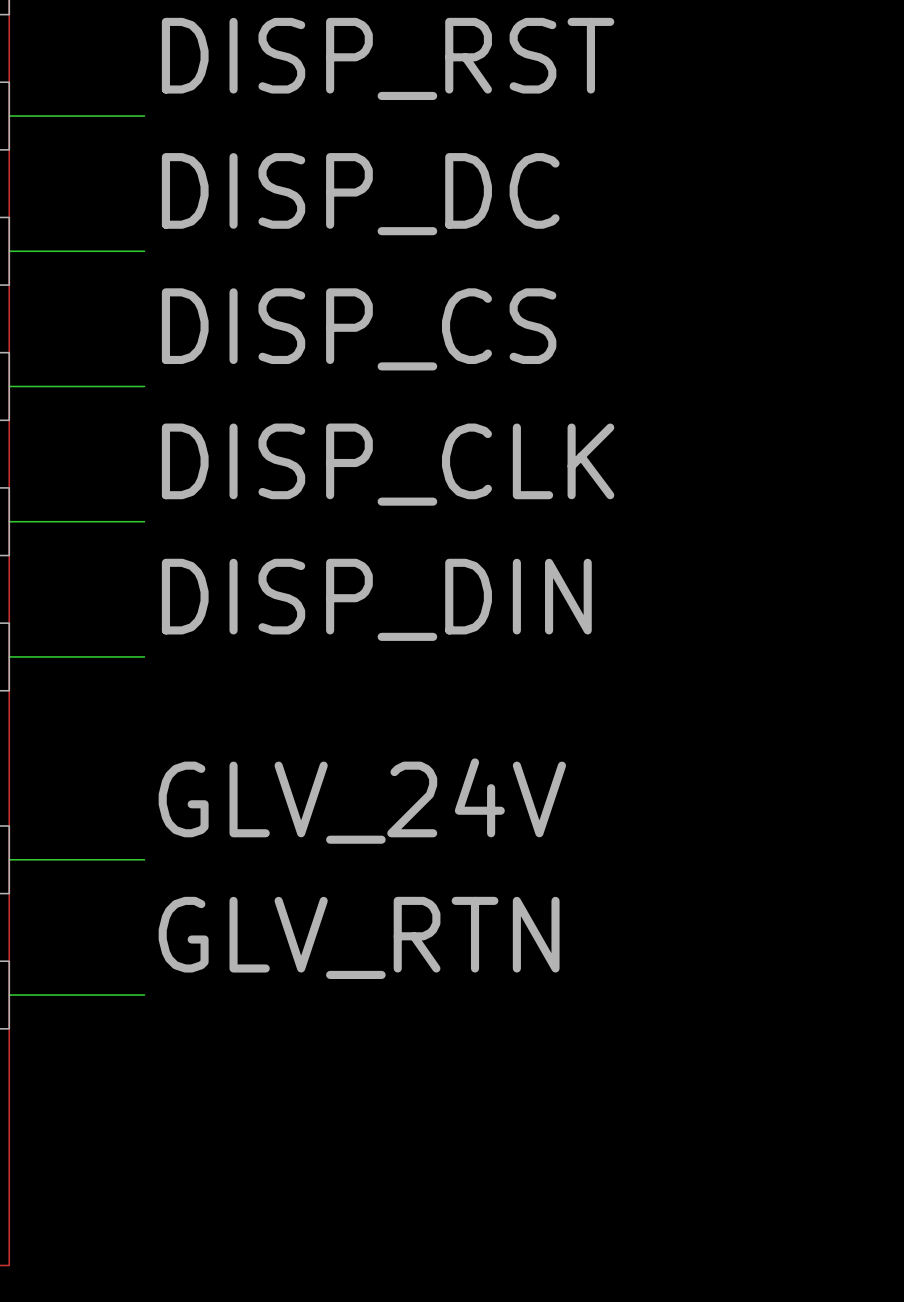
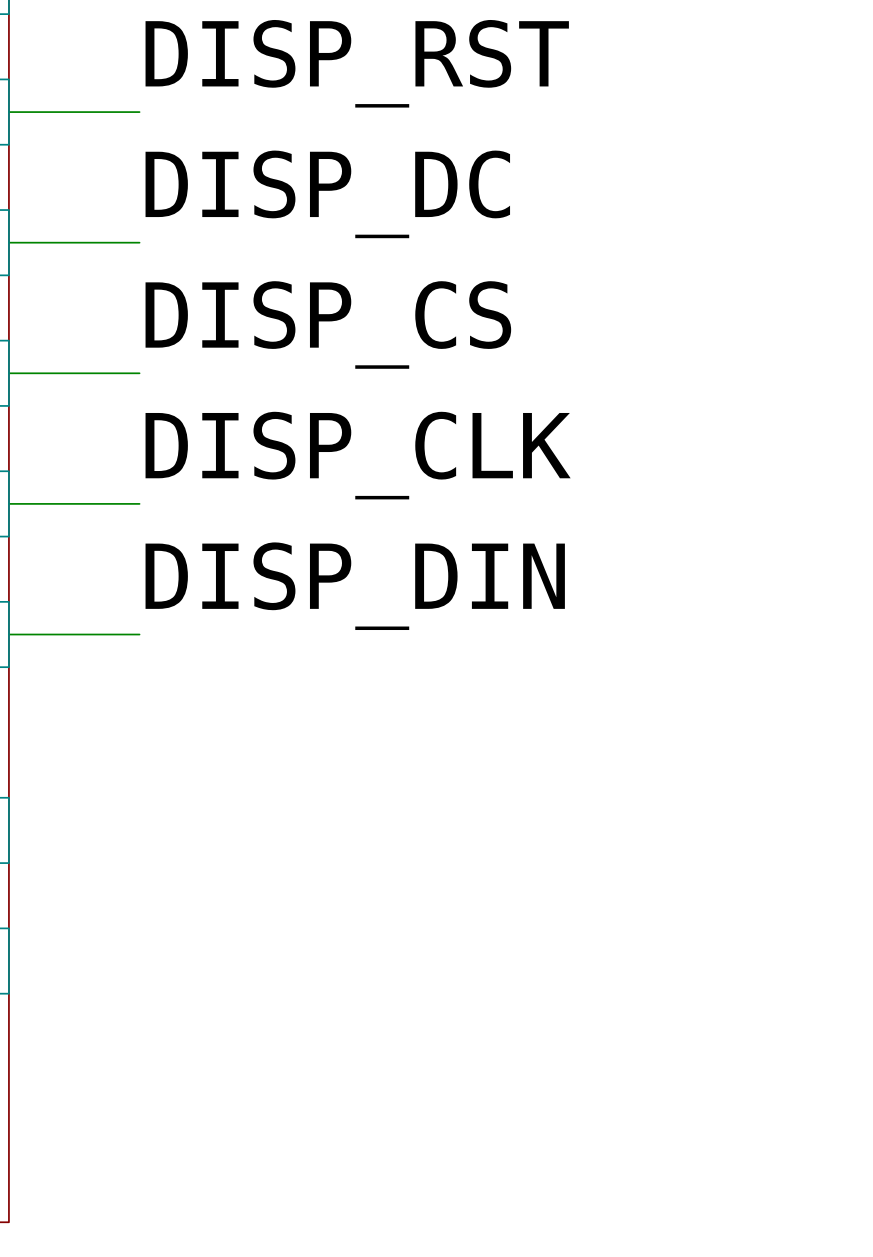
label: GLV_24V (362, 801) -> none
wire: (9, 859) (144, 859) -> none
label: GLV_RTN (359, 937) -> none
wire: (9, 995) (144, 995) -> none

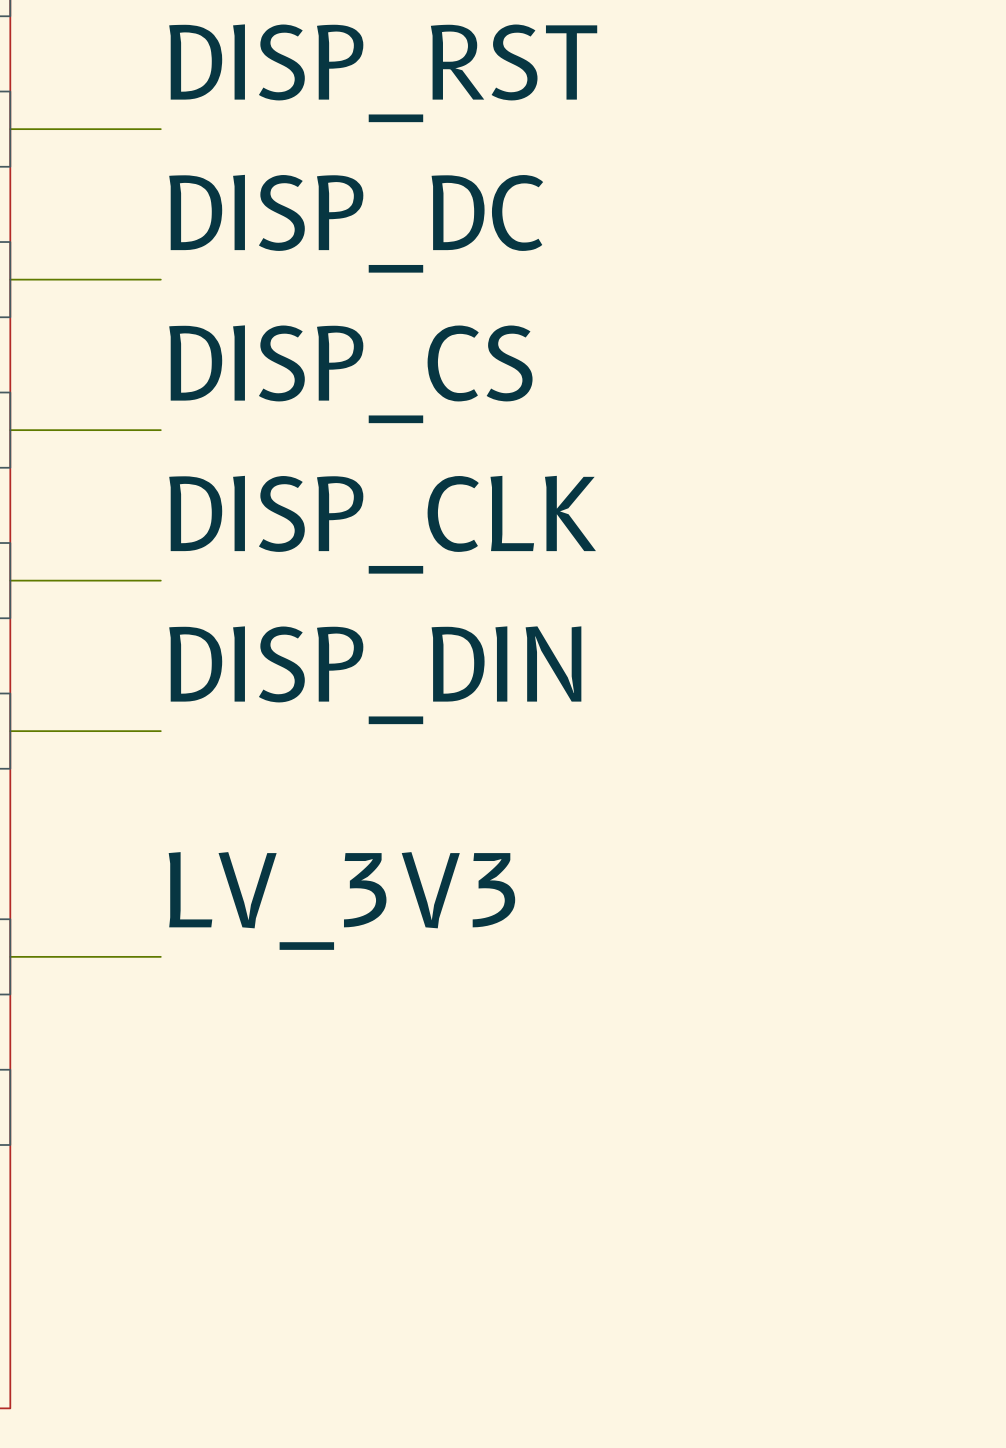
label: none -> LV_3V3 (341, 900)
wire: none -> (10, 956) (160, 956)

